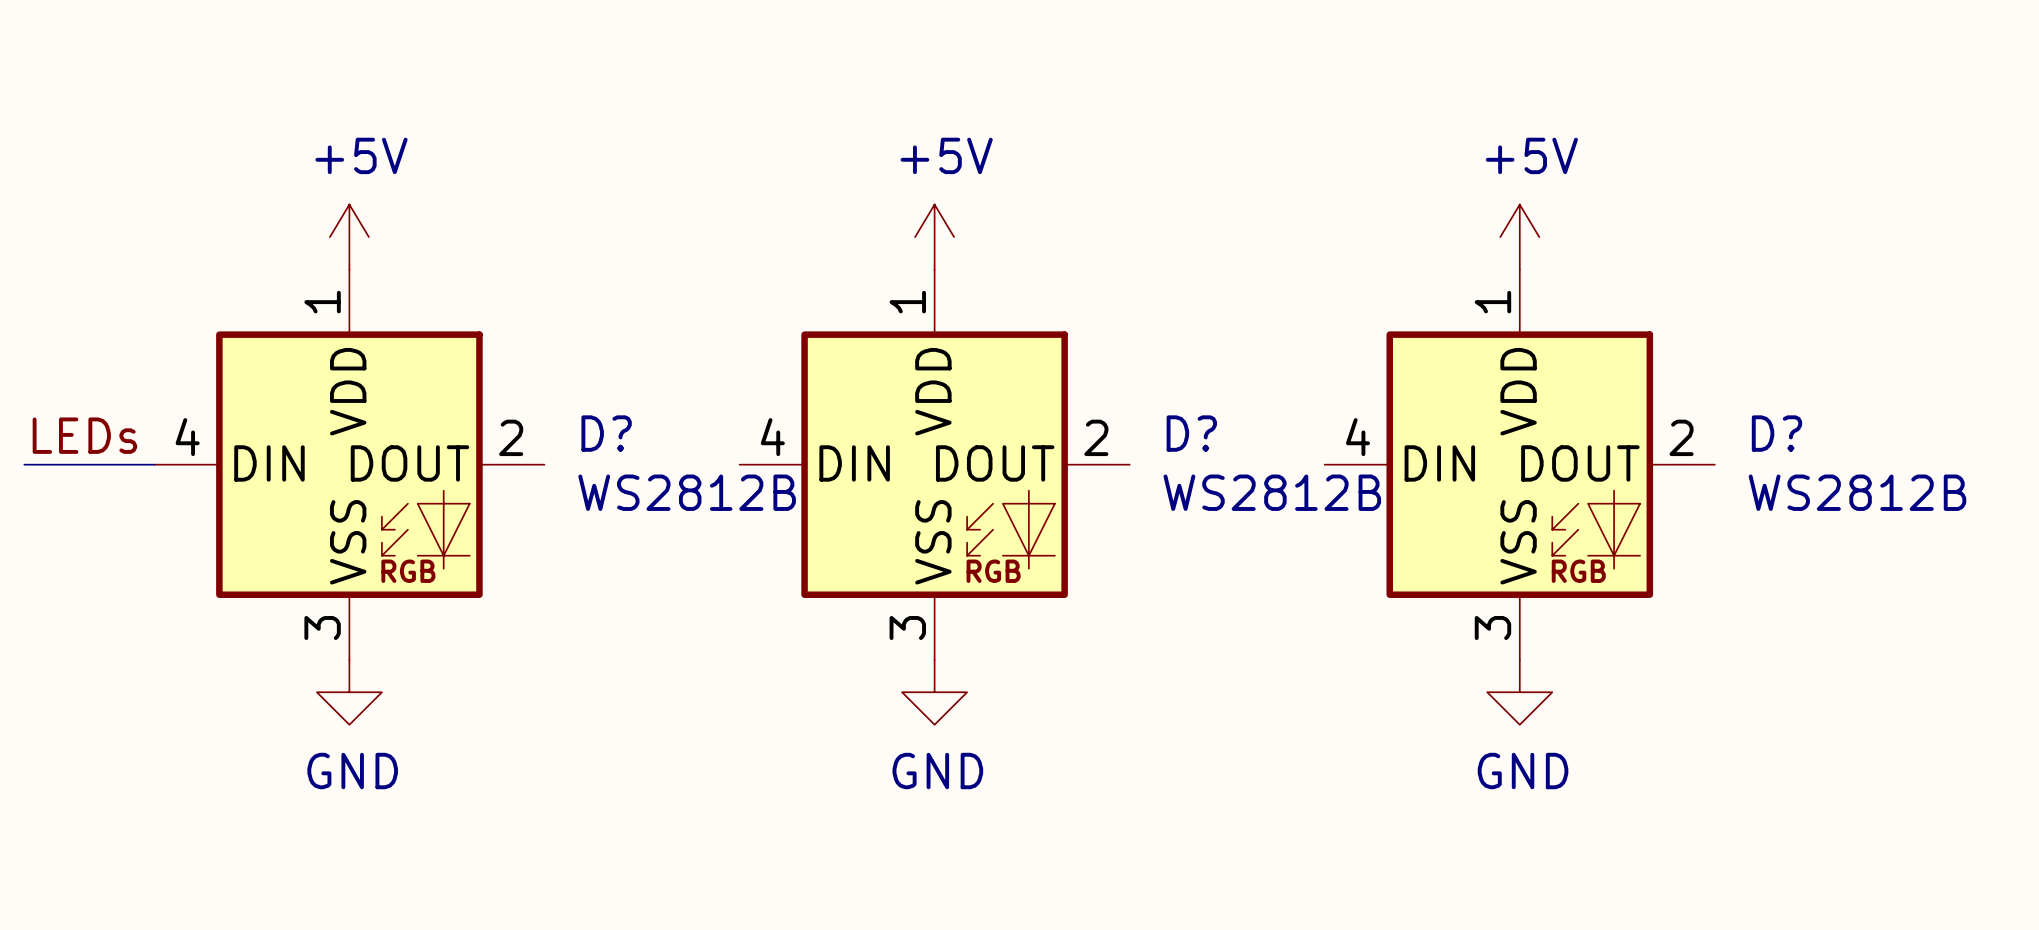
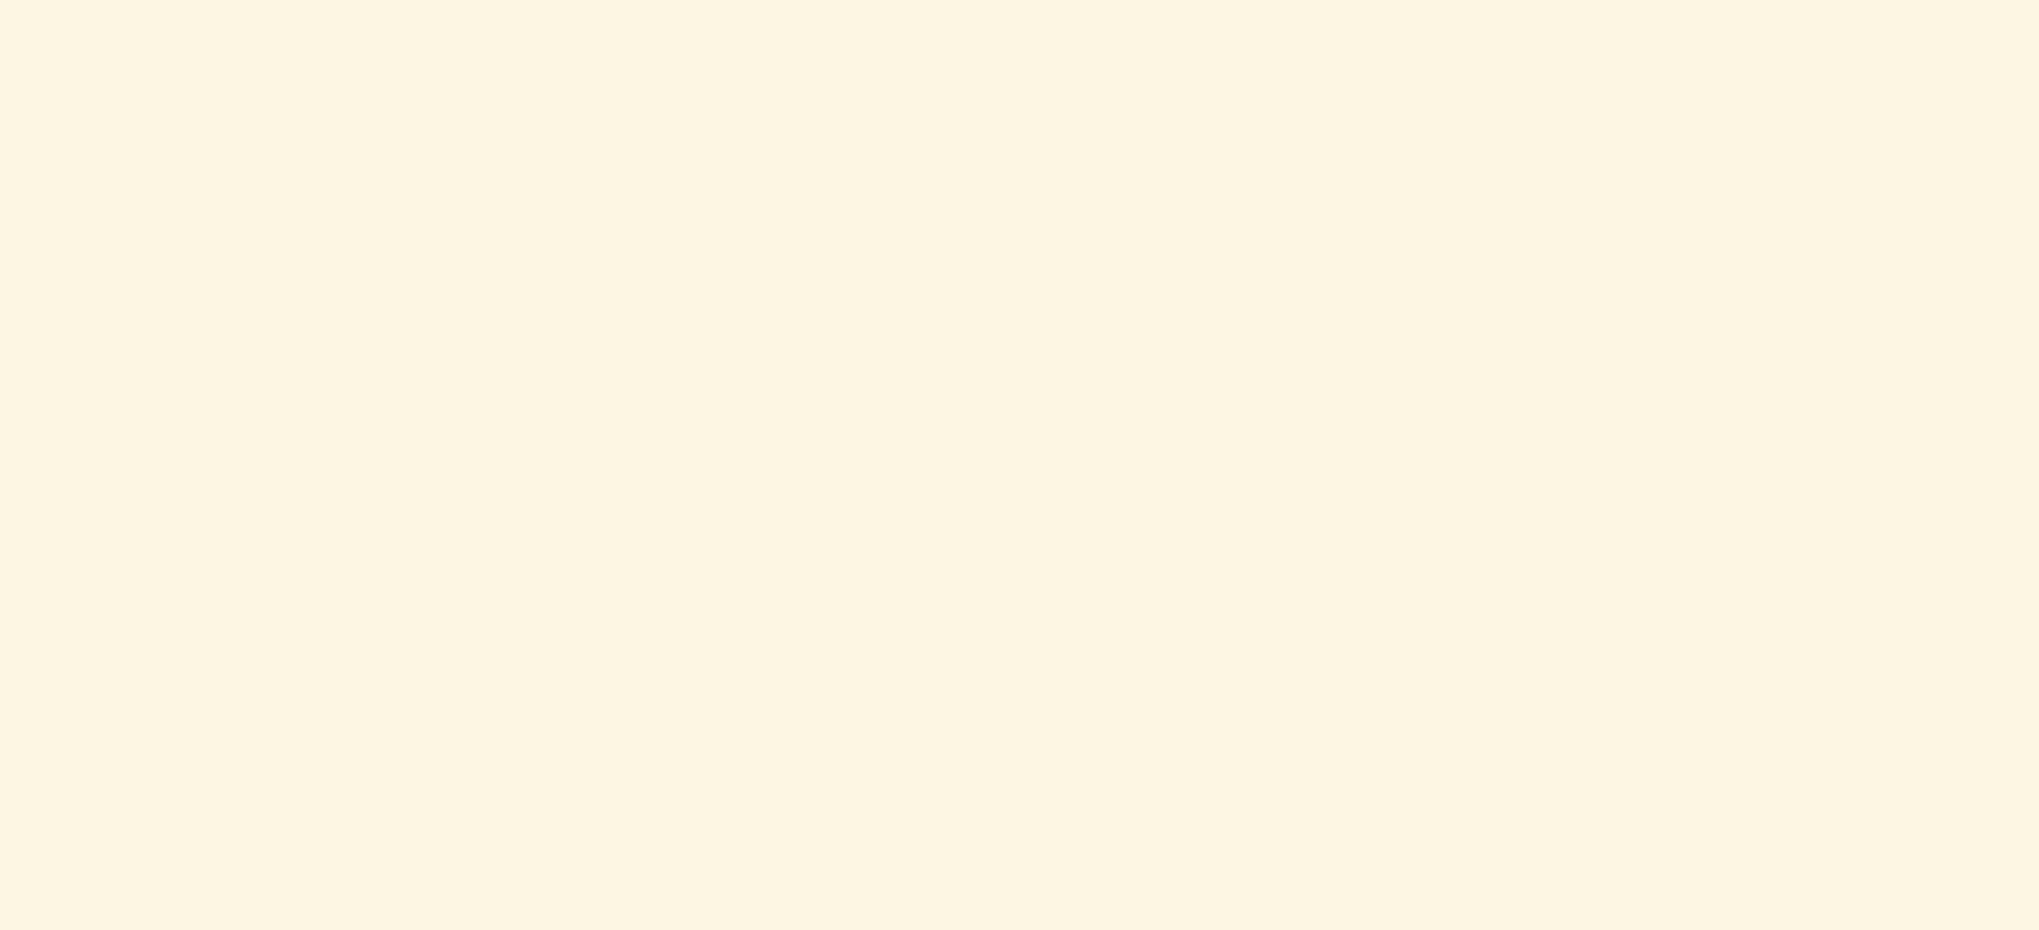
power symbol: +5V (349, 237) -> none
power symbol: +5V (934, 237) -> none
power symbol: +5V (1519, 237) -> none
label: LEDs (84, 435) -> none
wire: (24, 464) (154, 464) -> none
D?: WS2812B (349, 464) -> none
D?: WS2812B (934, 464) -> none
D?: WS2812B (1519, 464) -> none
power symbol: GND (349, 692) -> none
power symbol: GND (934, 692) -> none
power symbol: GND (1519, 692) -> none

